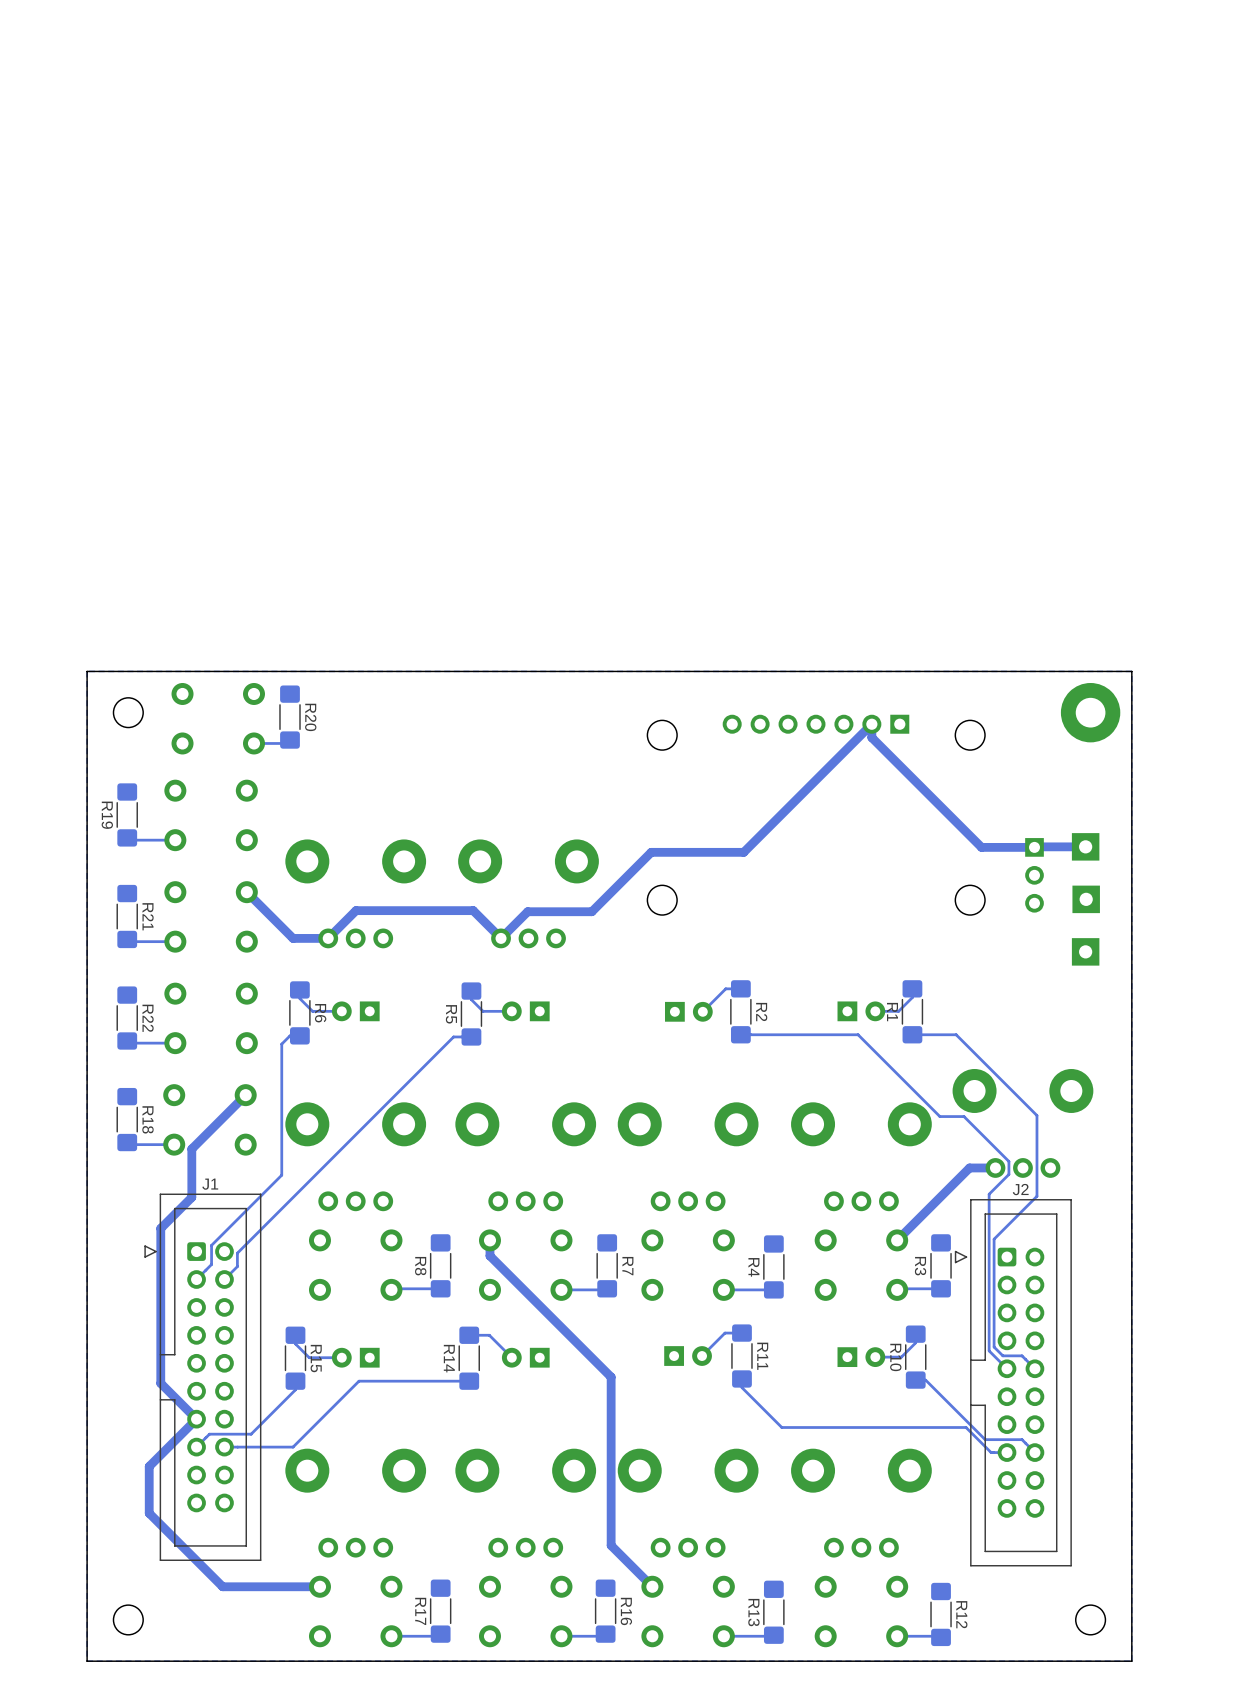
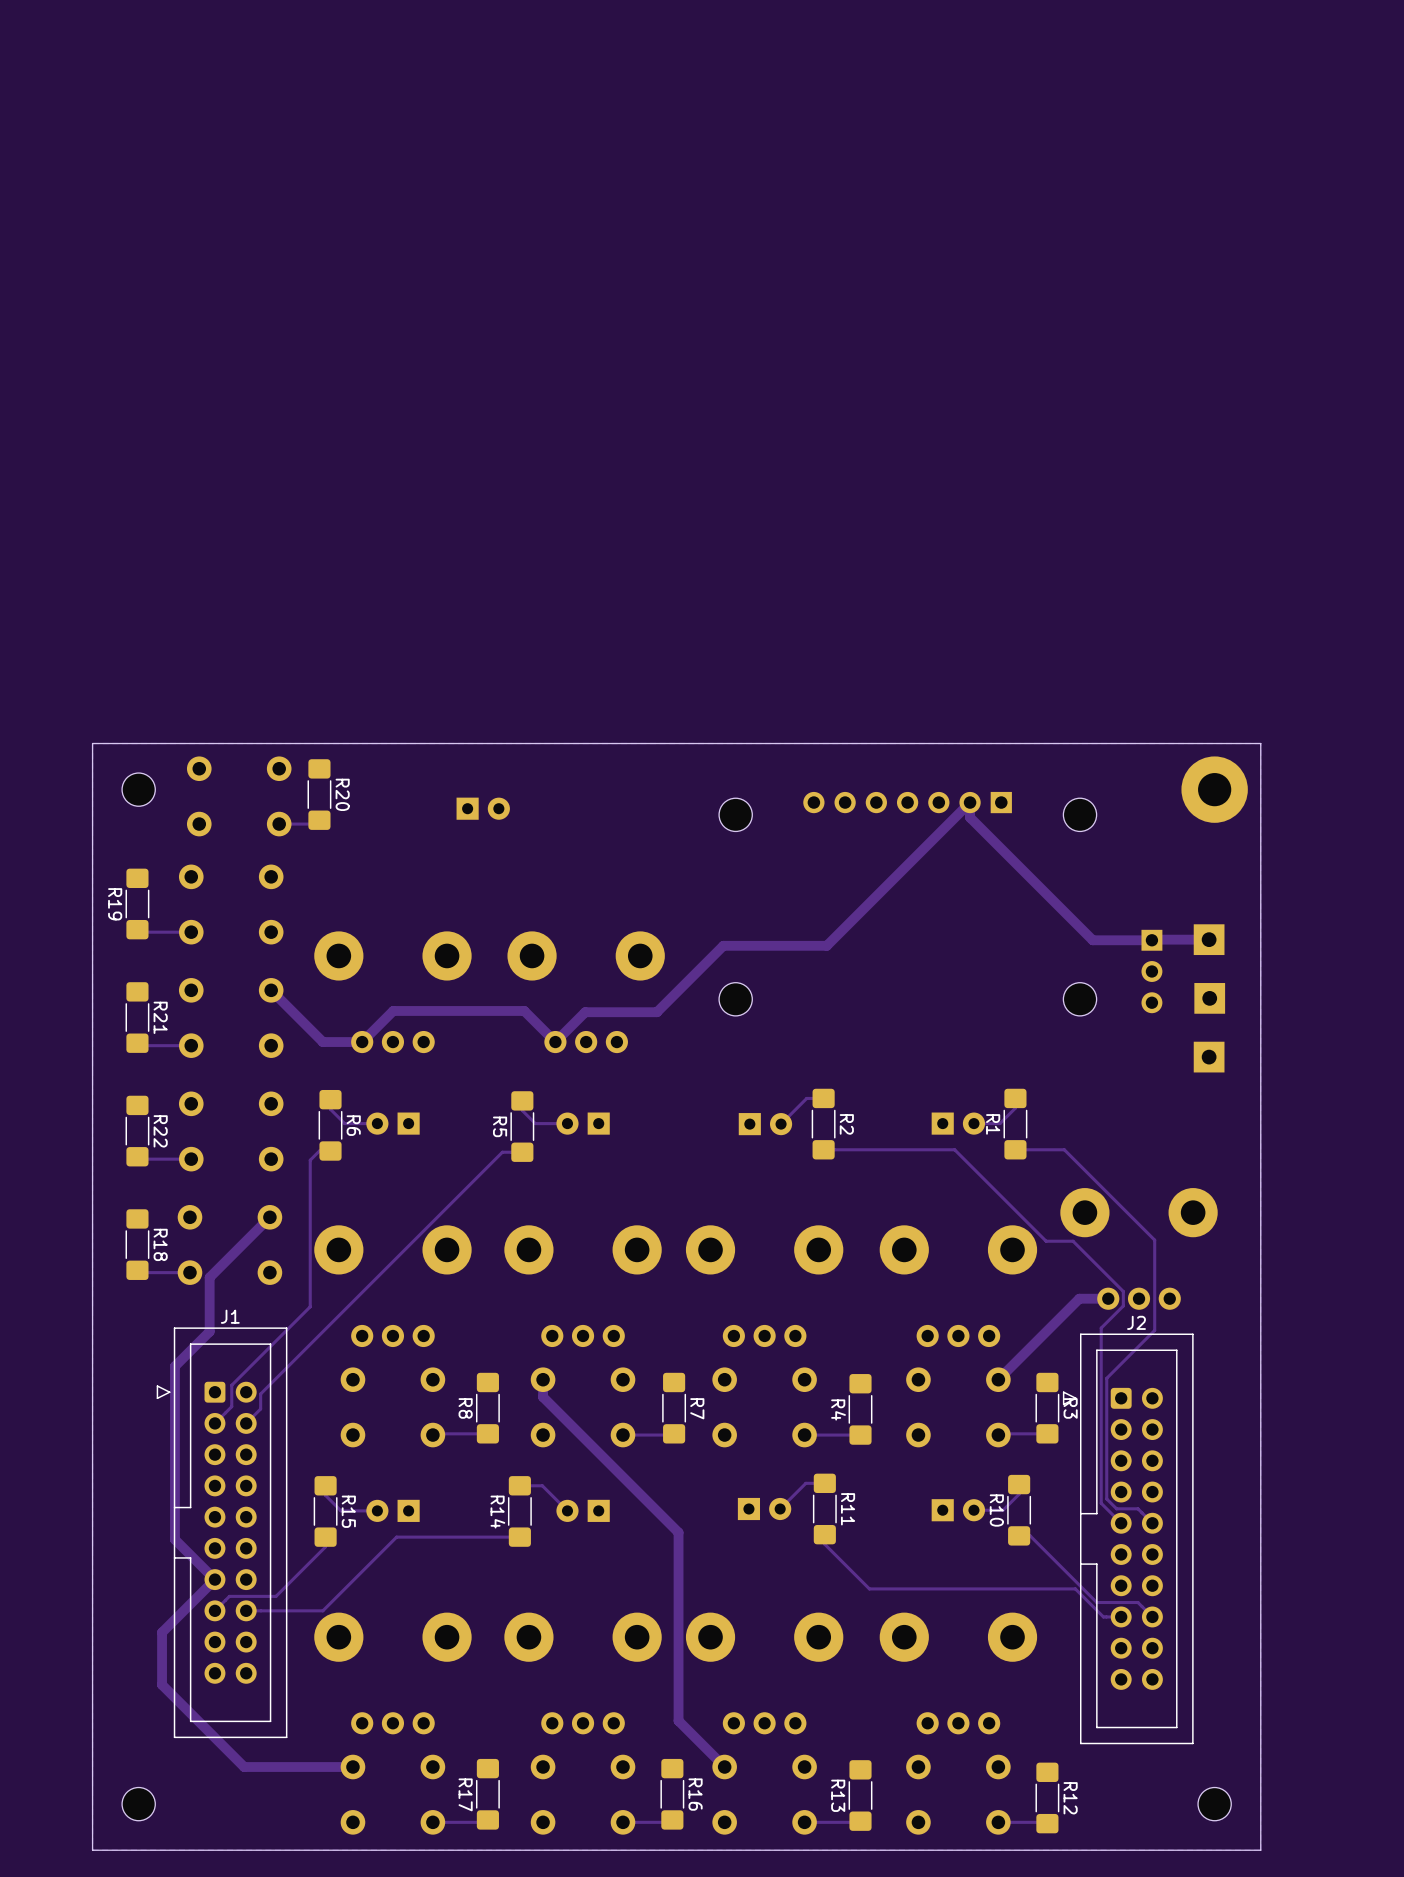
part: none -> (483, 808)
R3 name position: R3 (920, 1266) -> R3 (1070, 1408)

